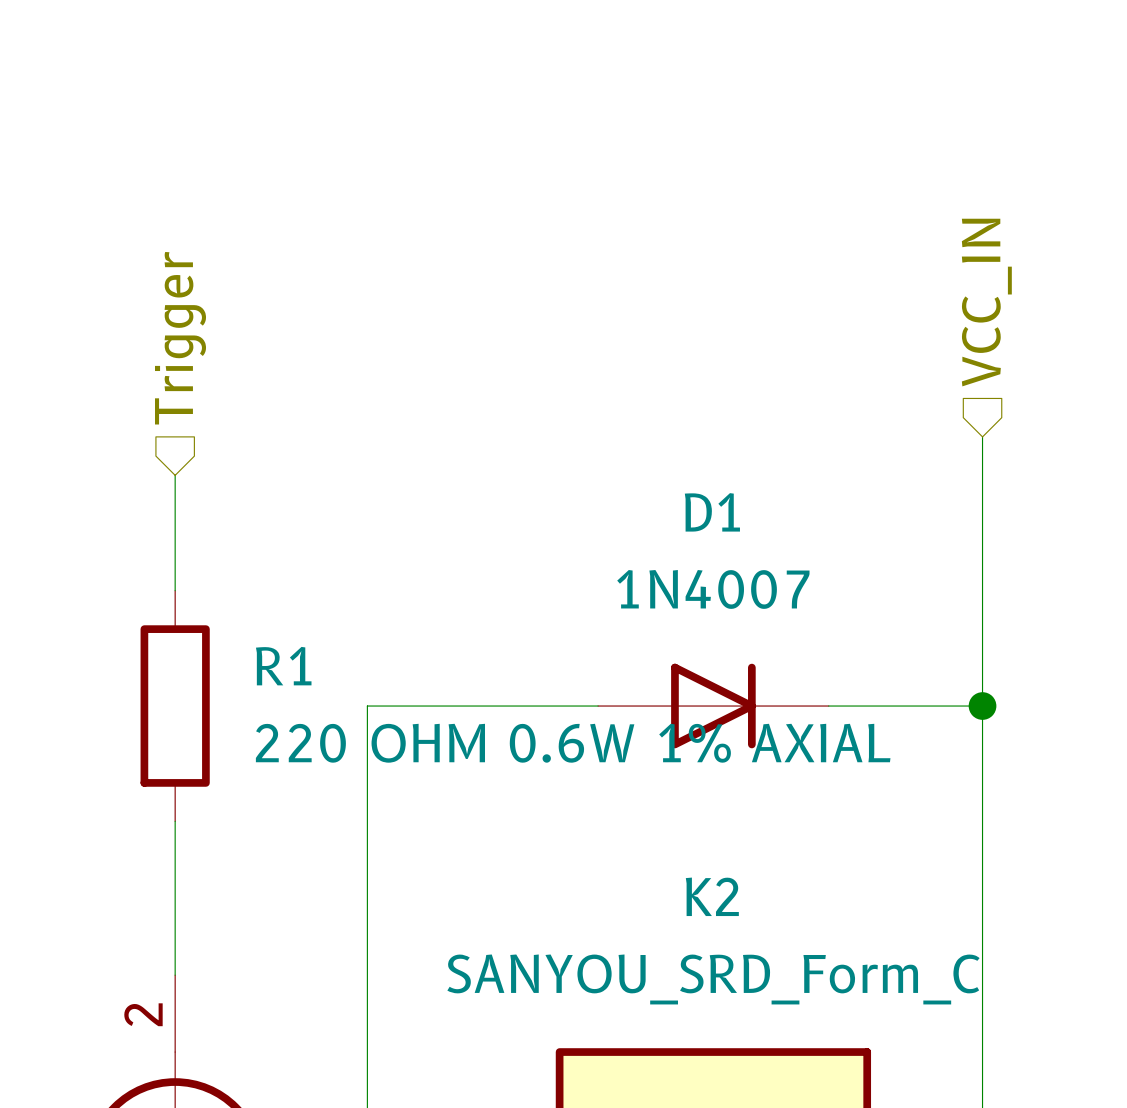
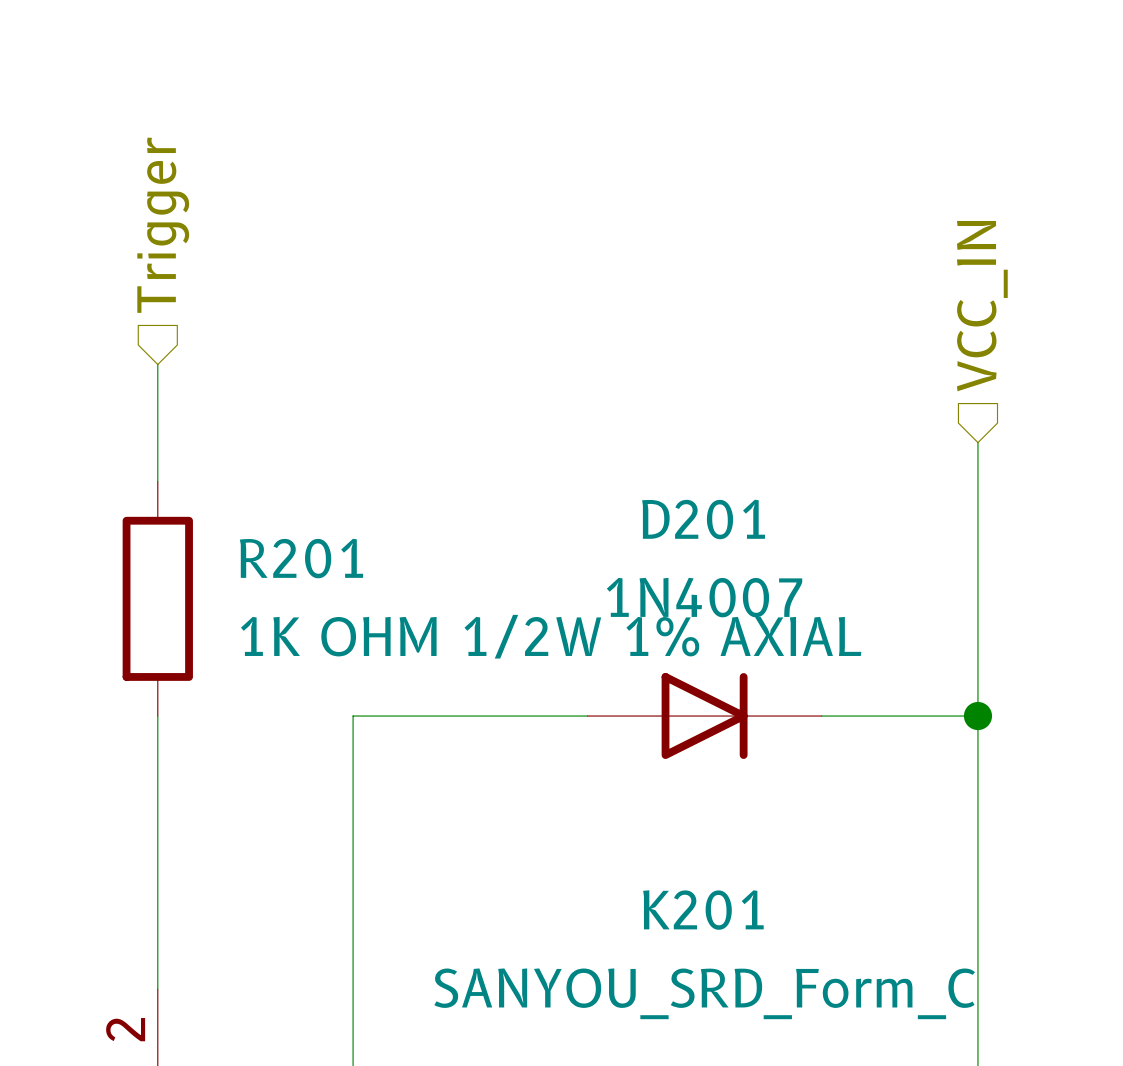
hierarchical label position: Trigger (180, 338) -> Trigger (163, 225)
wire: (175, 475) (175, 590) -> (157, 481) (157, 364)
D1 name: D1 (712, 512) -> D201 (703, 519)
R201: none -> 1K OHM 1/2W 1% AXIAL (157, 598)
wire: none -> (157, 716) (157, 833)
R1: 220 OHM 0.6W 1% AXIAL (175, 706) -> none
K2 name: K2 (712, 896) -> K201 (703, 910)

